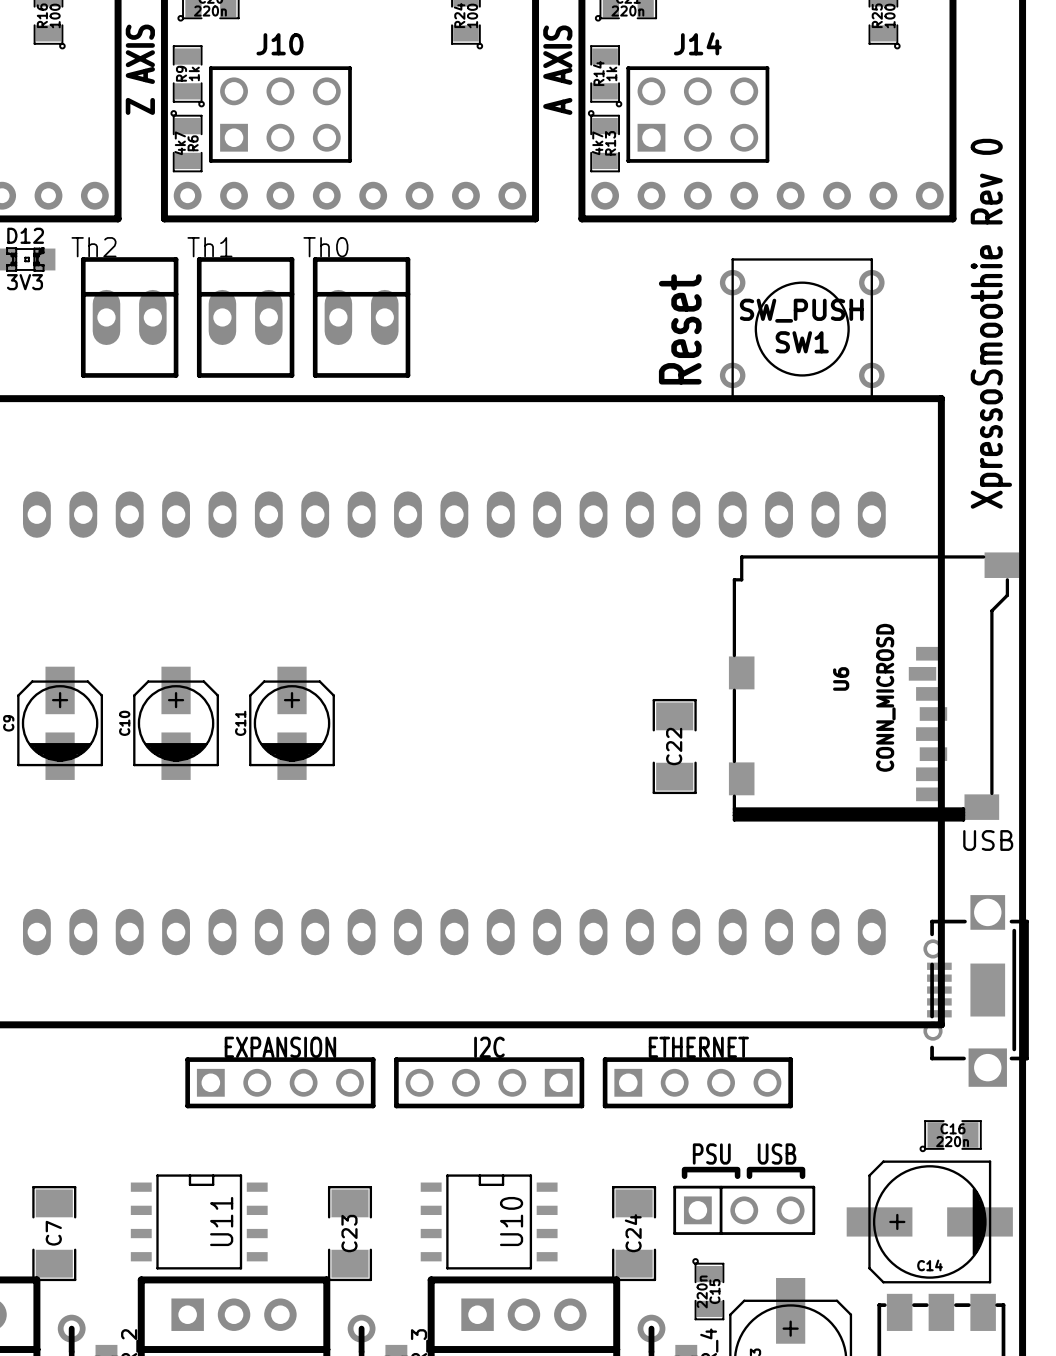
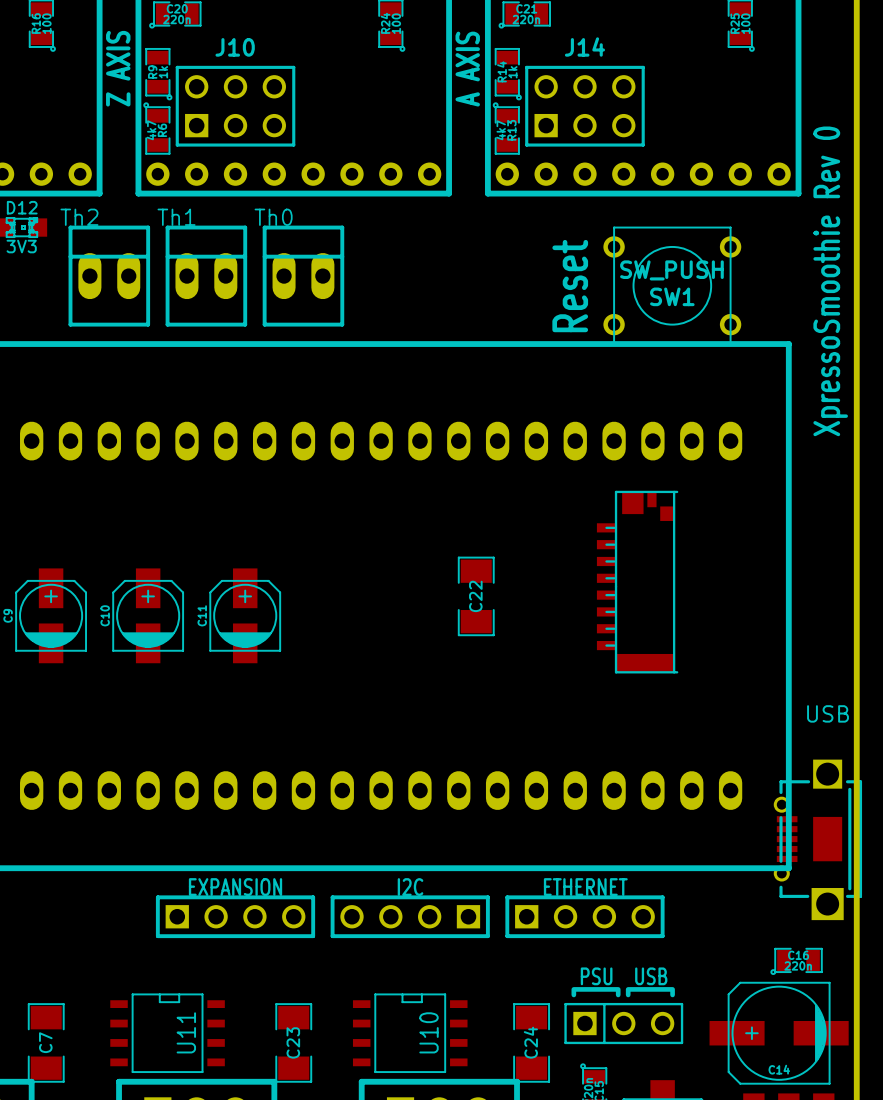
part: none -> (637, 582)
U6: CONN_MICROSD (874, 686) -> none
C22 position: (674, 746) -> (476, 596)

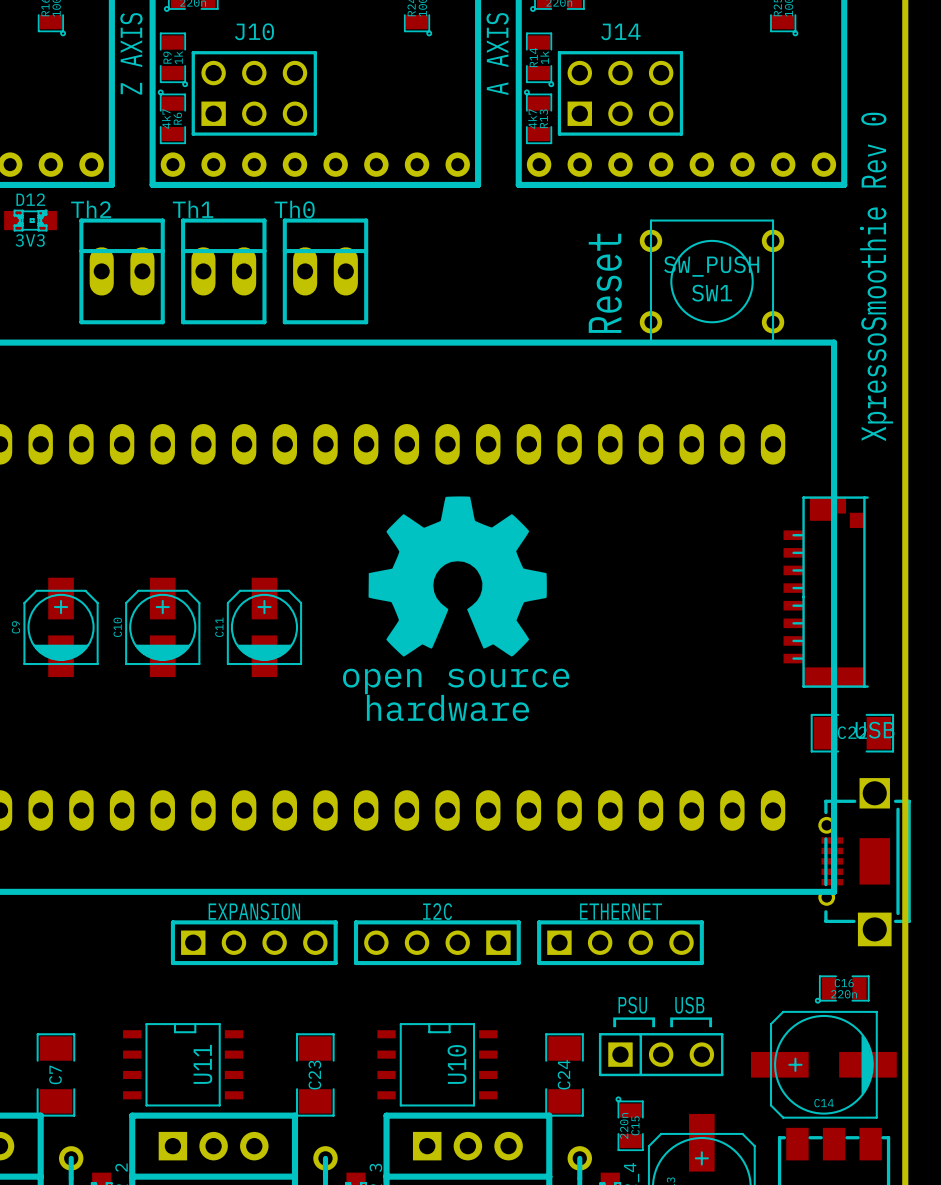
drawing: none -> [368, 496, 547, 657]
part position: (637, 582) -> (826, 592)
C22 rotation: 0° (476, 596) -> 90° clockwise (852, 733)
C22 position: (476, 596) -> (852, 733)

